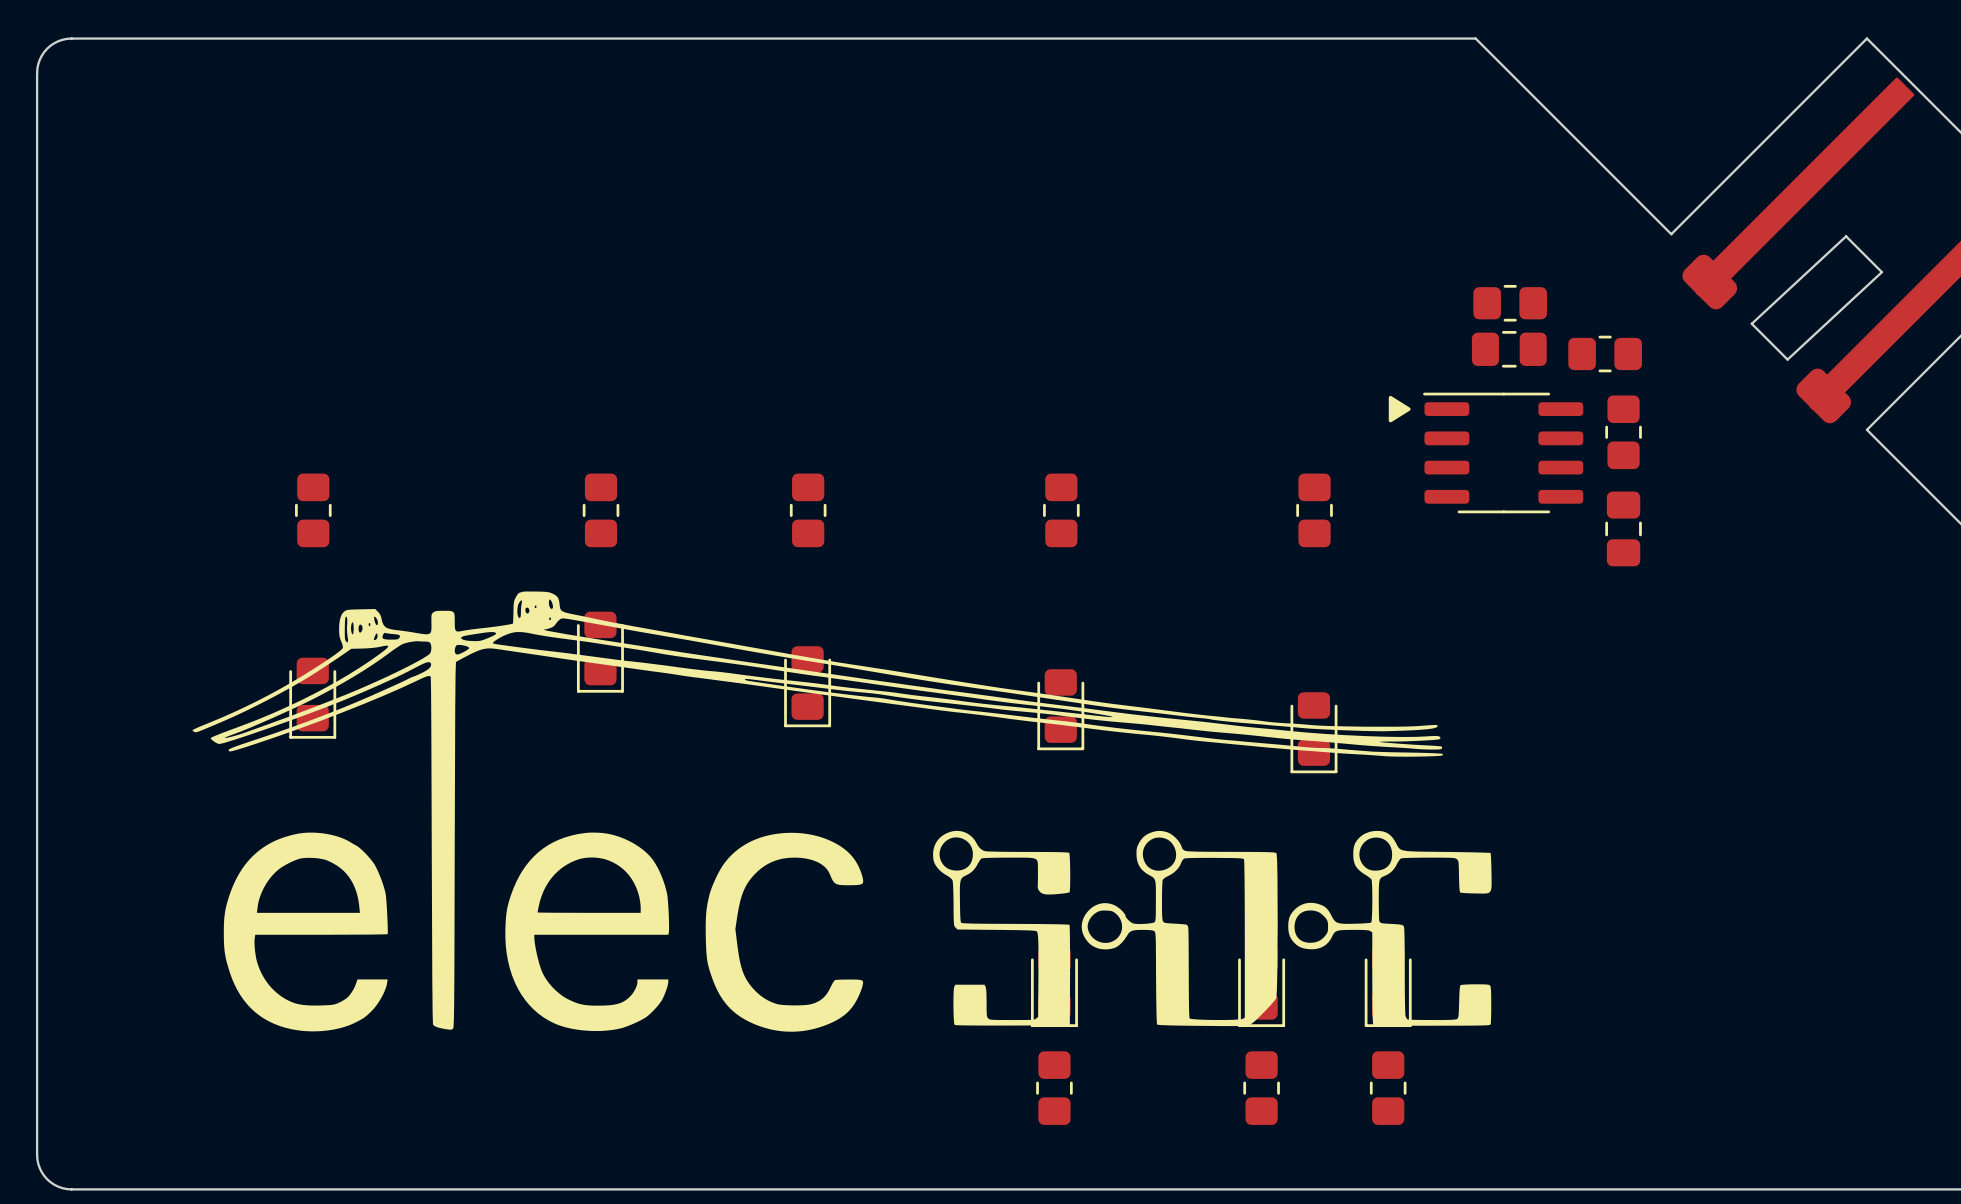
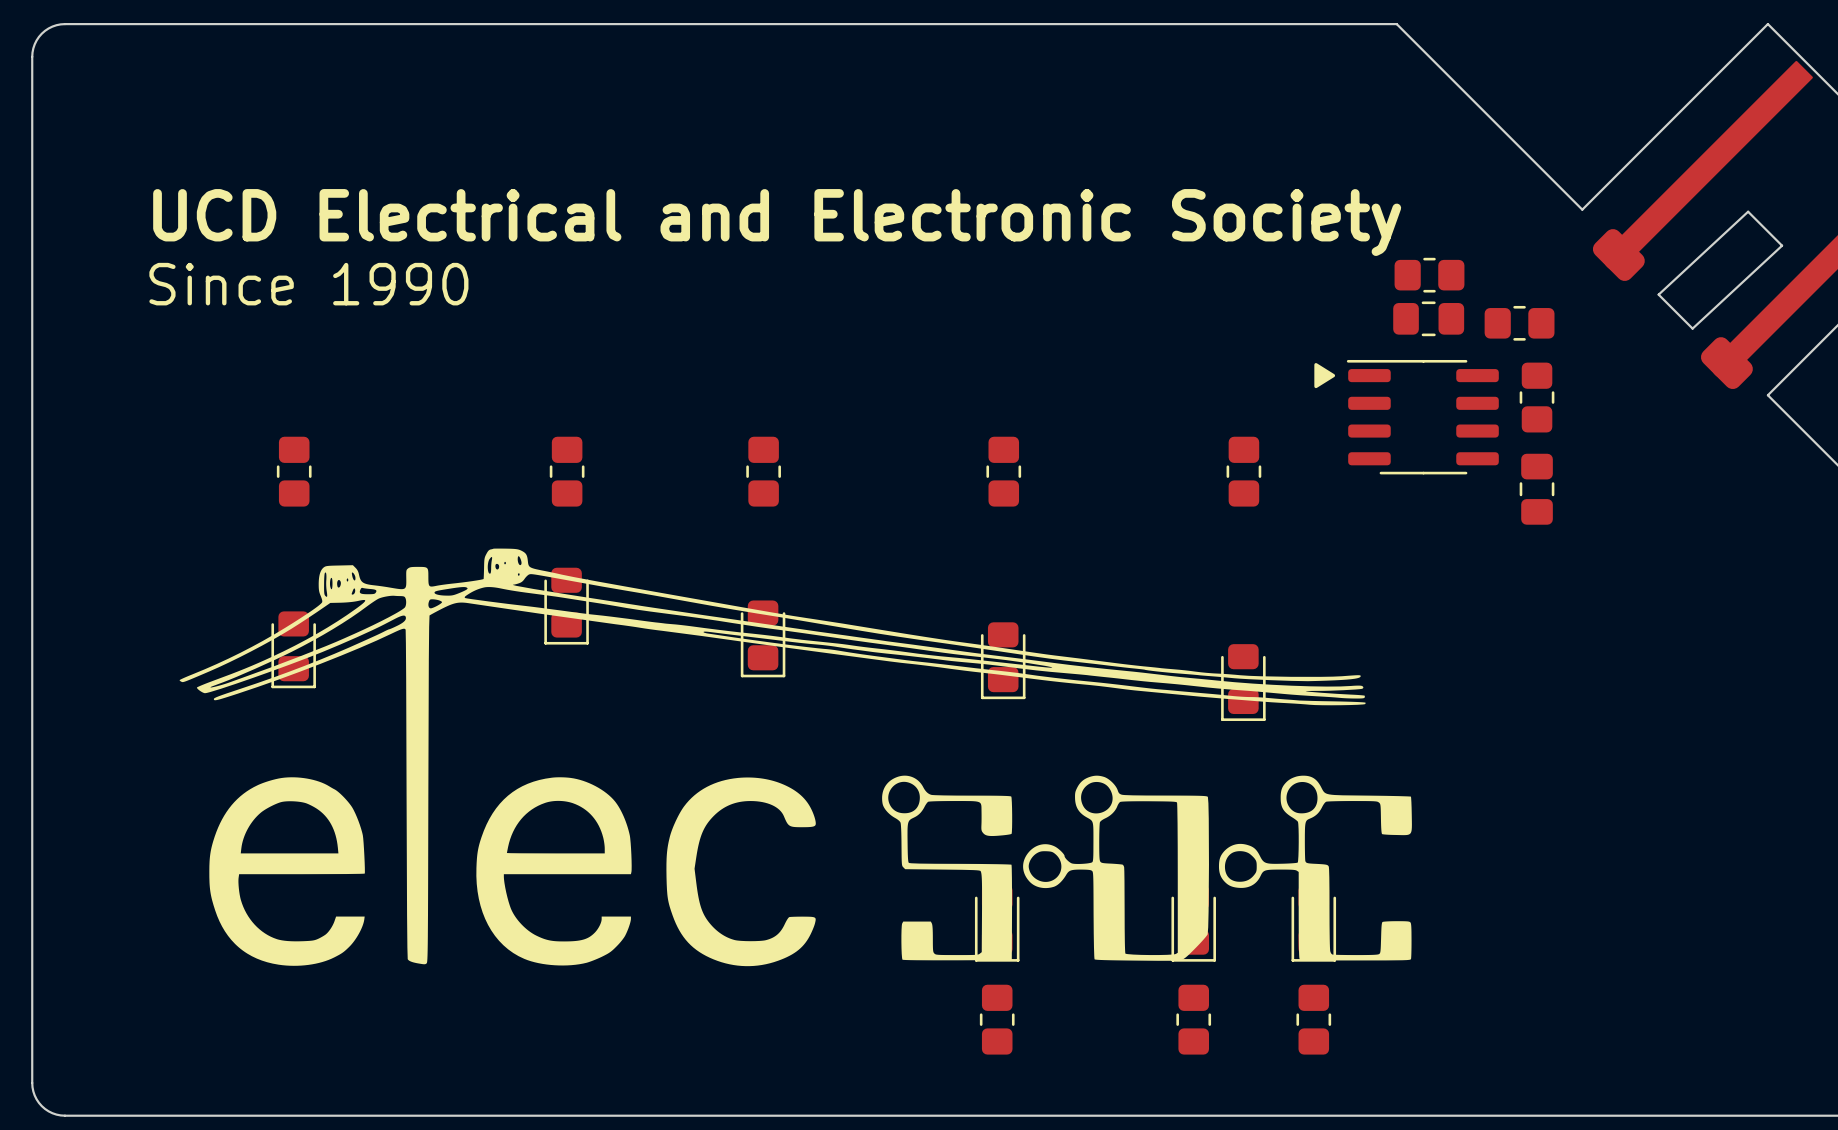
text: none -> UCD Electrical and Electronic Society (777, 222)
text: none -> Since 1990 (308, 284)

